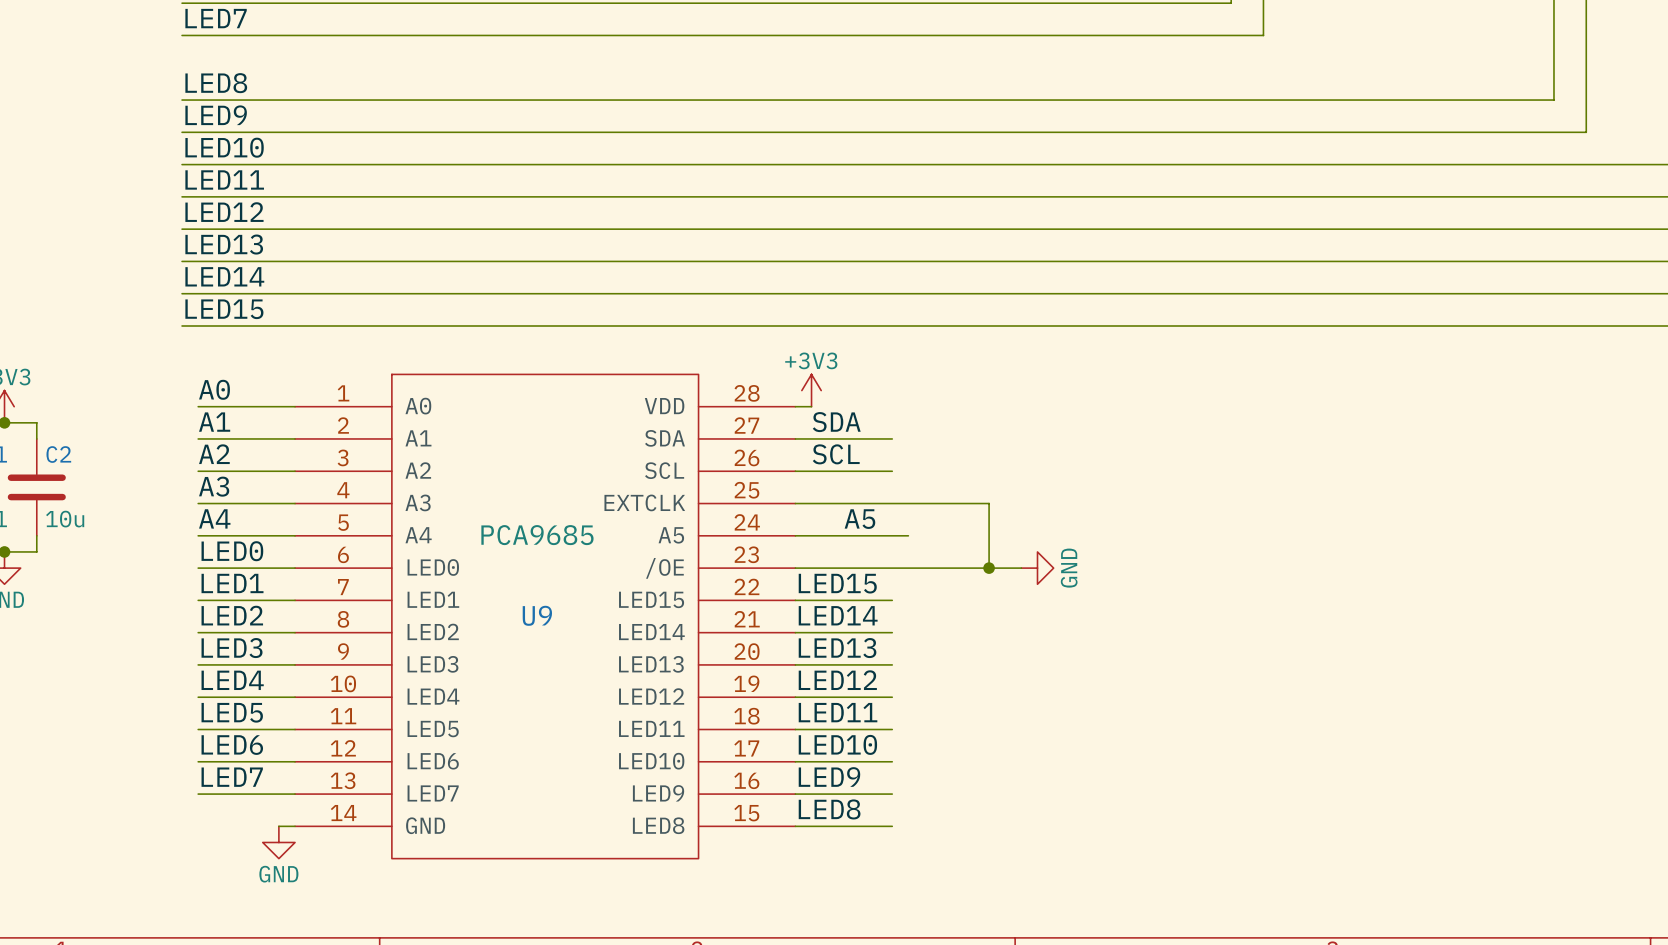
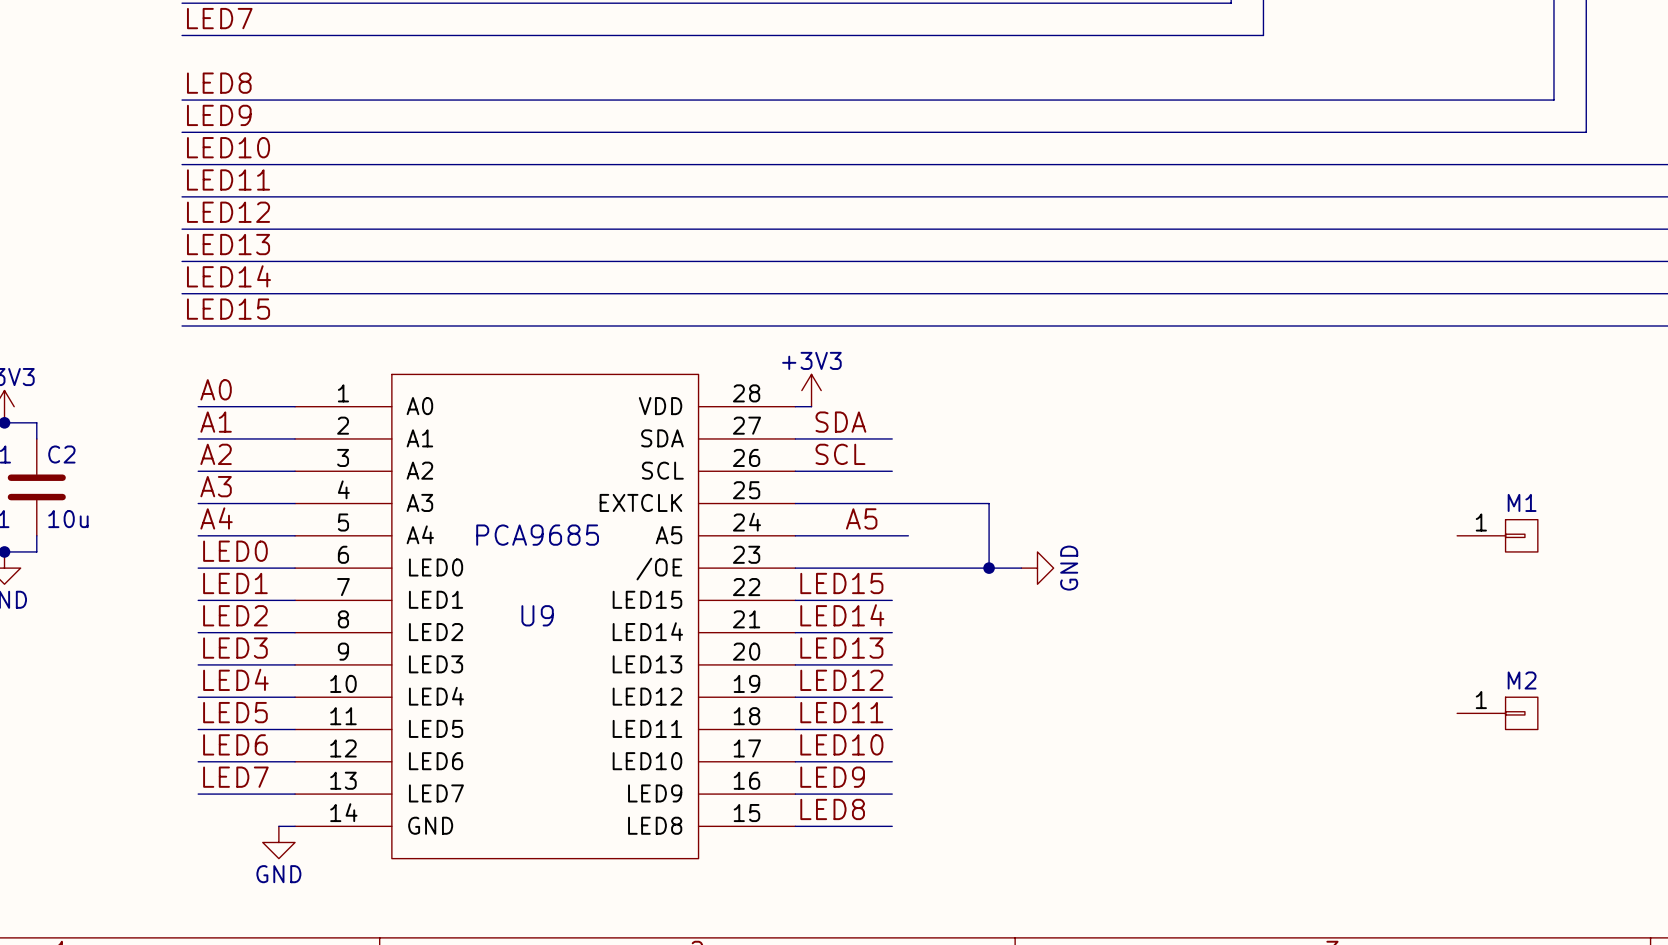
M1: none -> (1497, 535)
M2: none -> (1497, 713)

